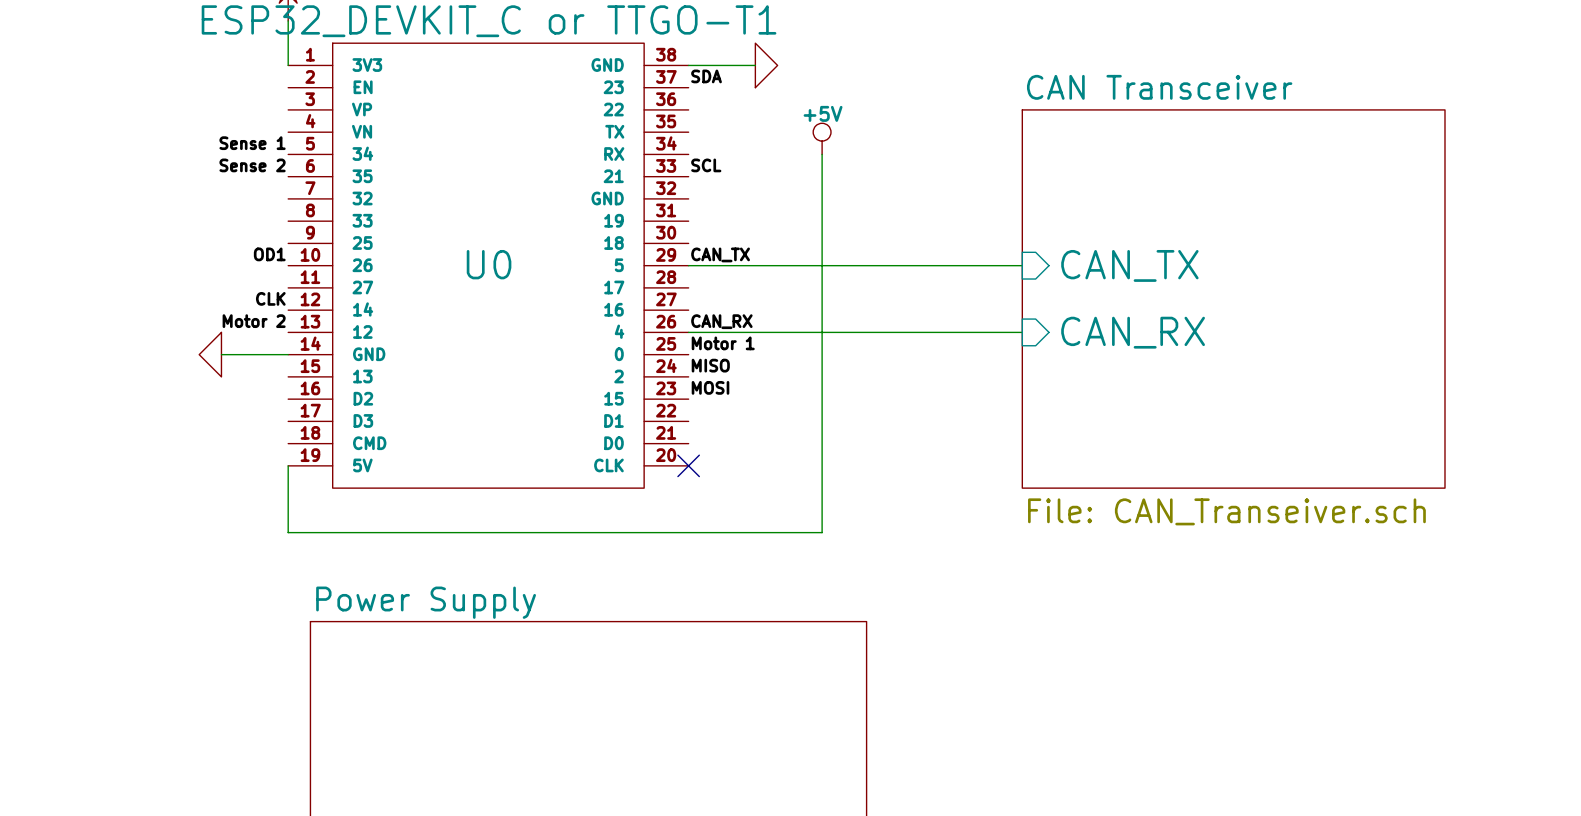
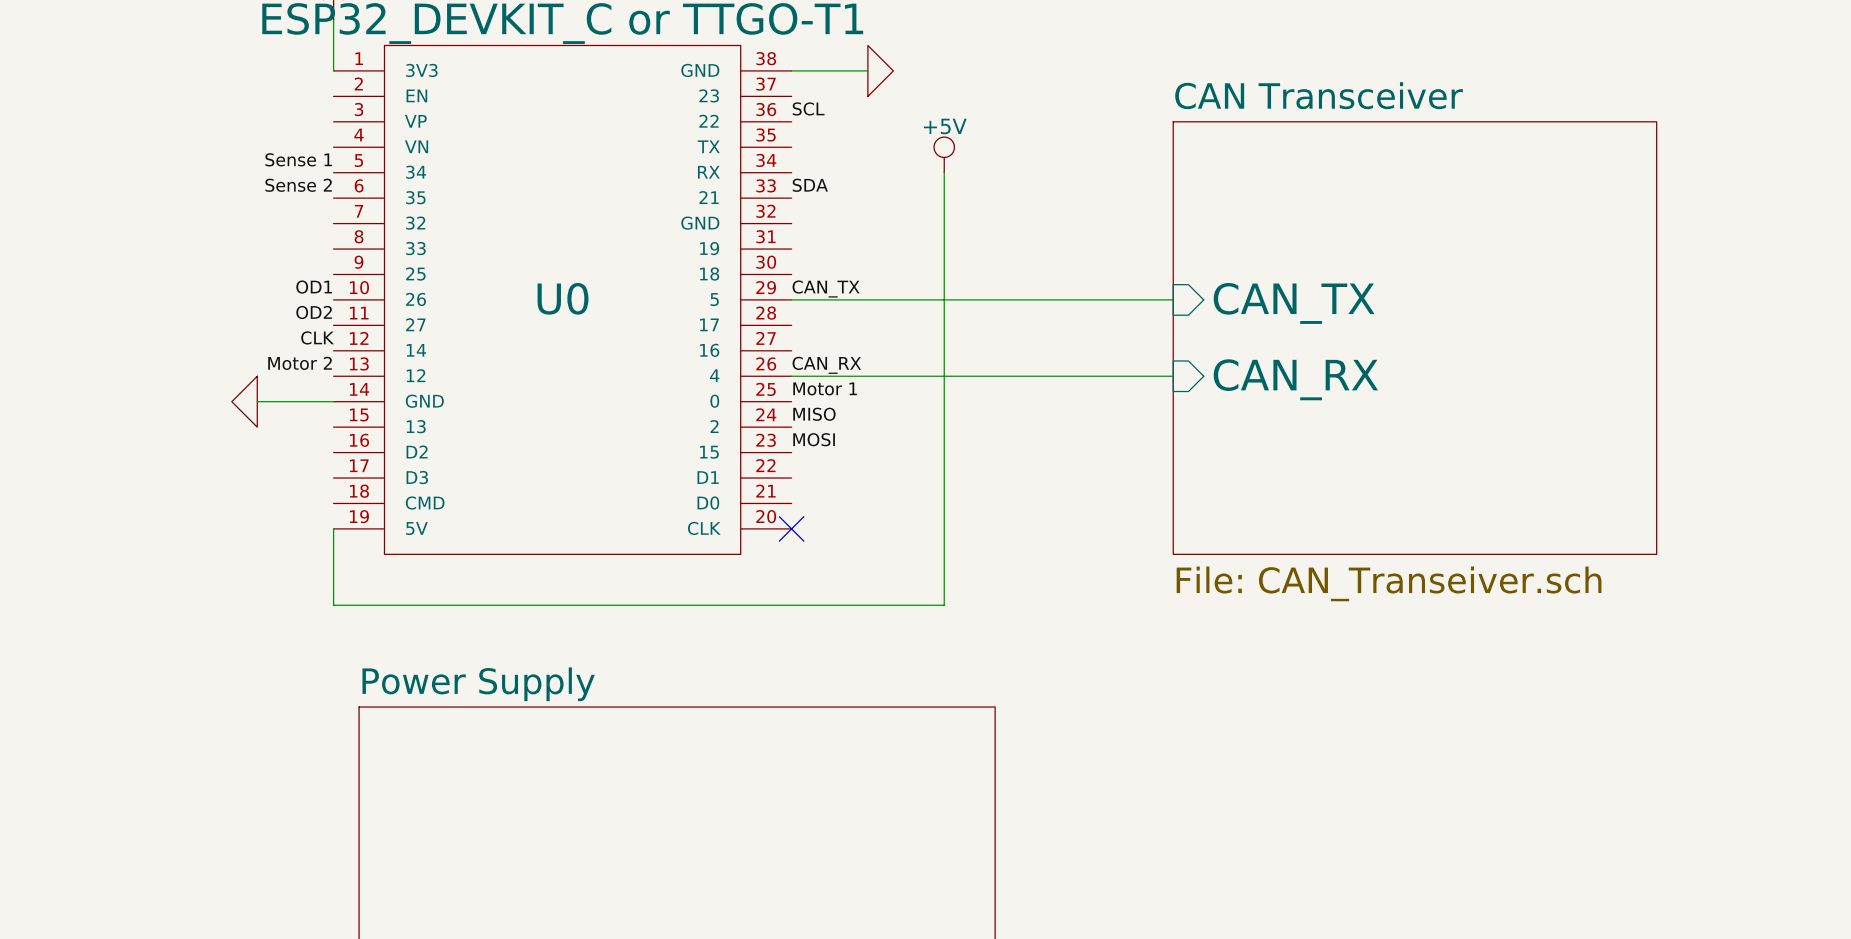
label: SDA (706, 76) -> none
label: none -> SCL (808, 108)
label: SCL (706, 165) -> SDA (810, 185)
label: none -> OD2 (314, 312)

